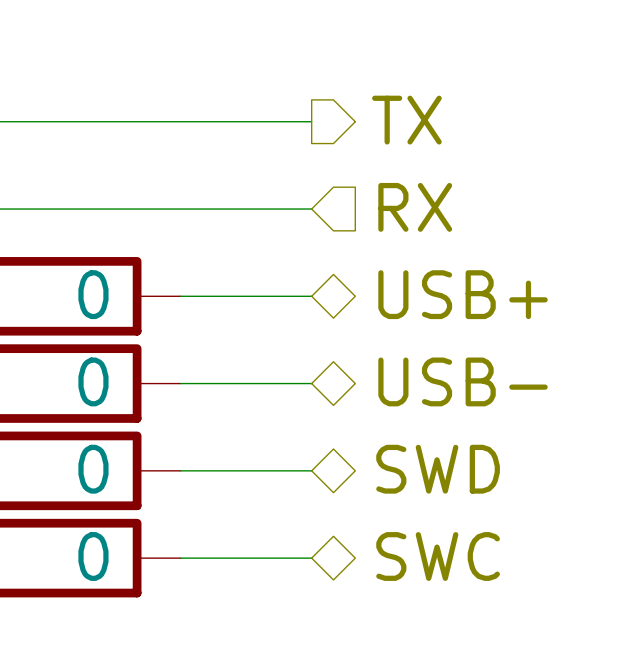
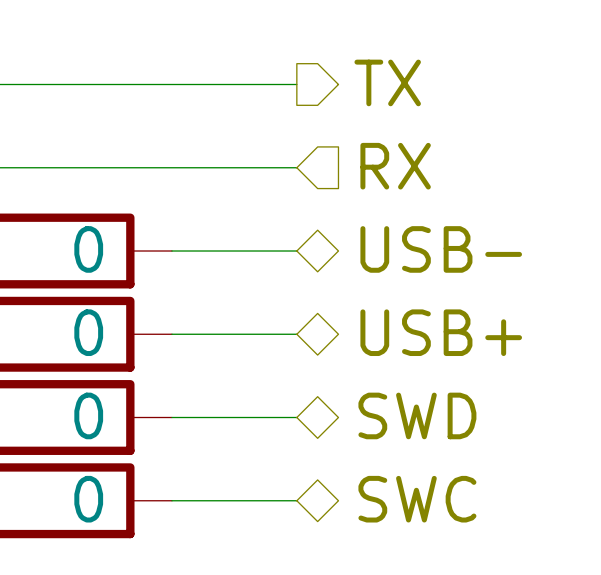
hierarchical label: USB+ (463, 294) -> USB- (441, 249)
hierarchical label: USB- (463, 381) -> USB+ (441, 332)

